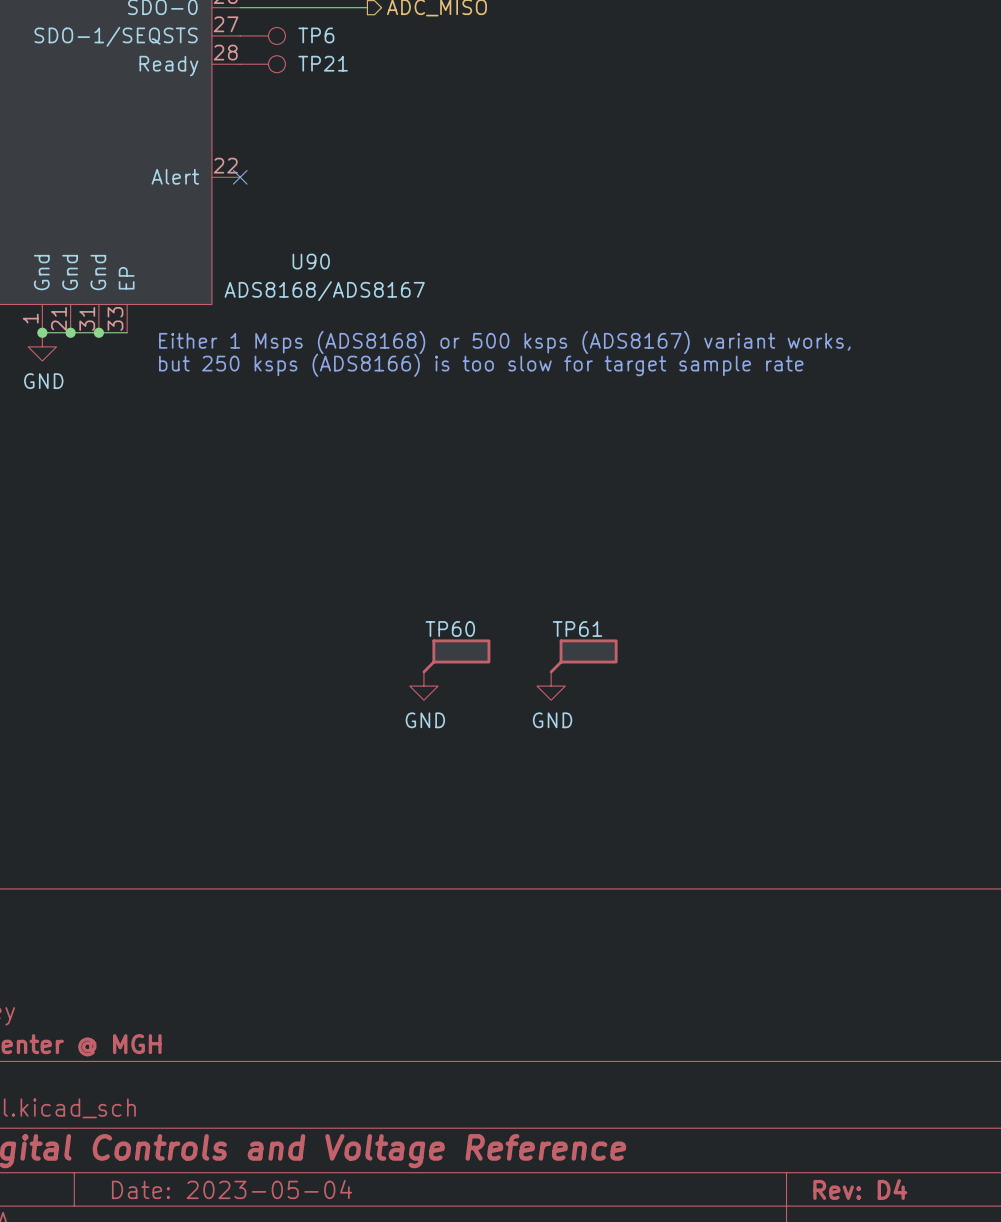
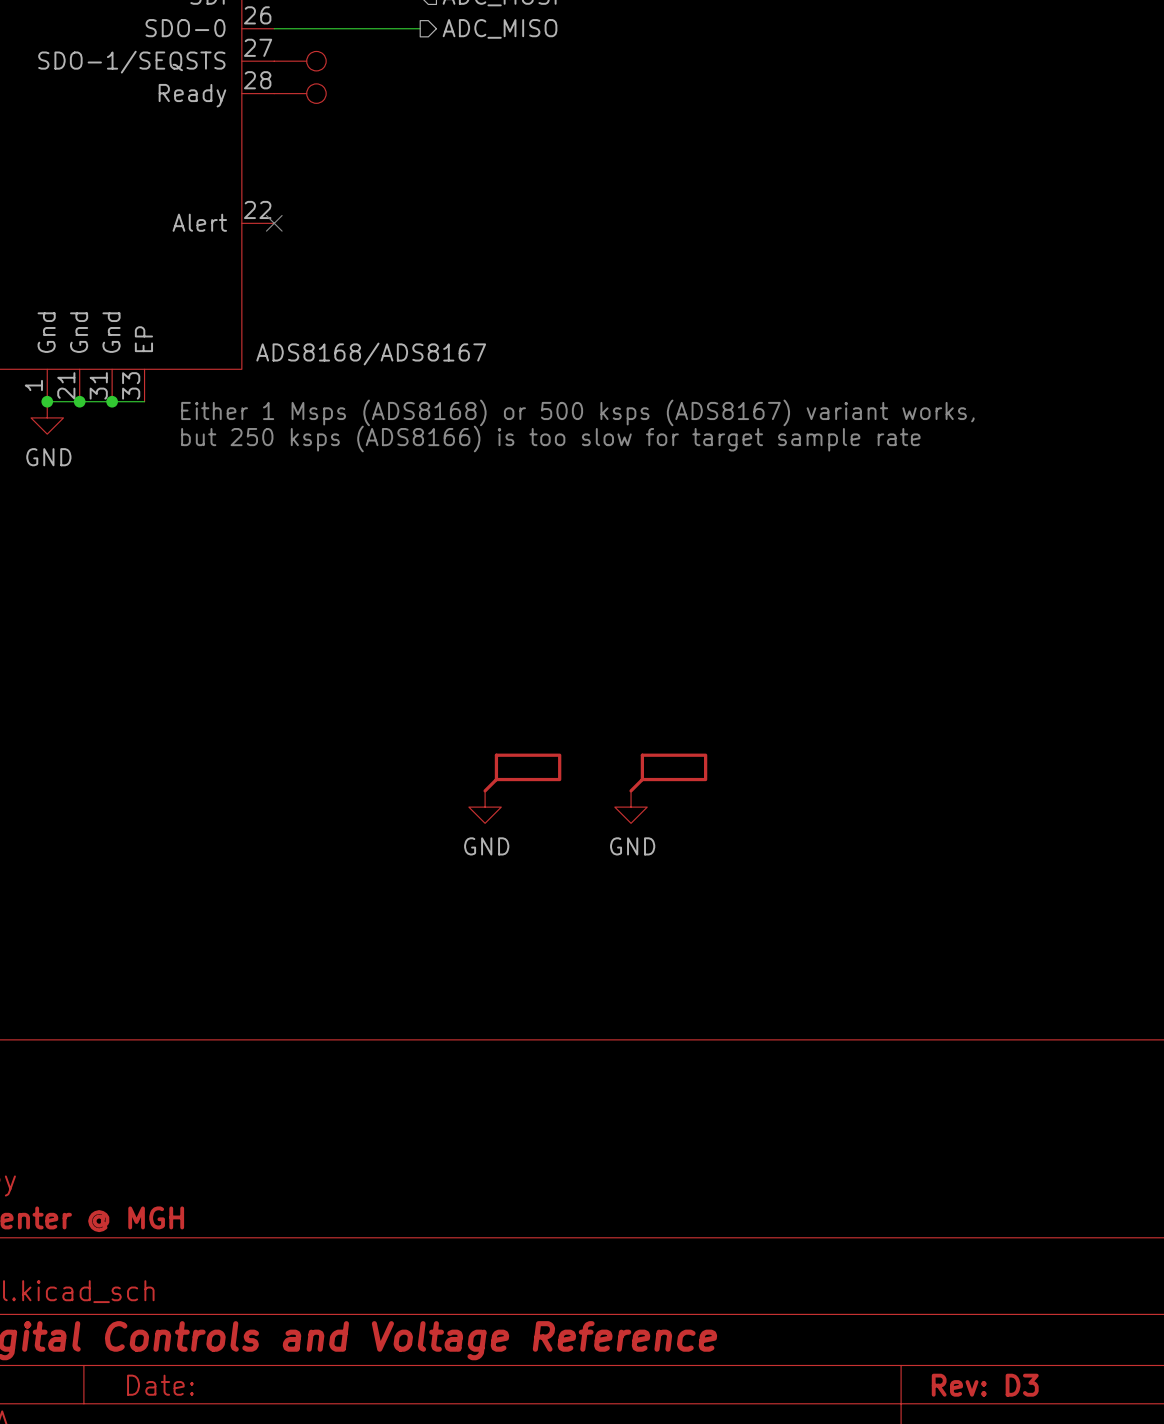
TP6 name: TP6 (316, 35) -> none
TP21 name: TP21 (323, 63) -> none
U90 name: U90 (311, 261) -> none
TP60 name: TP60 (450, 629) -> none
TP61 name: TP61 (577, 629) -> none
title block: Date: 2023-05-04 (232, 1189) -> Date: (160, 1385)
title block: Rev: D4 (860, 1189) -> Rev: D3 (985, 1385)

